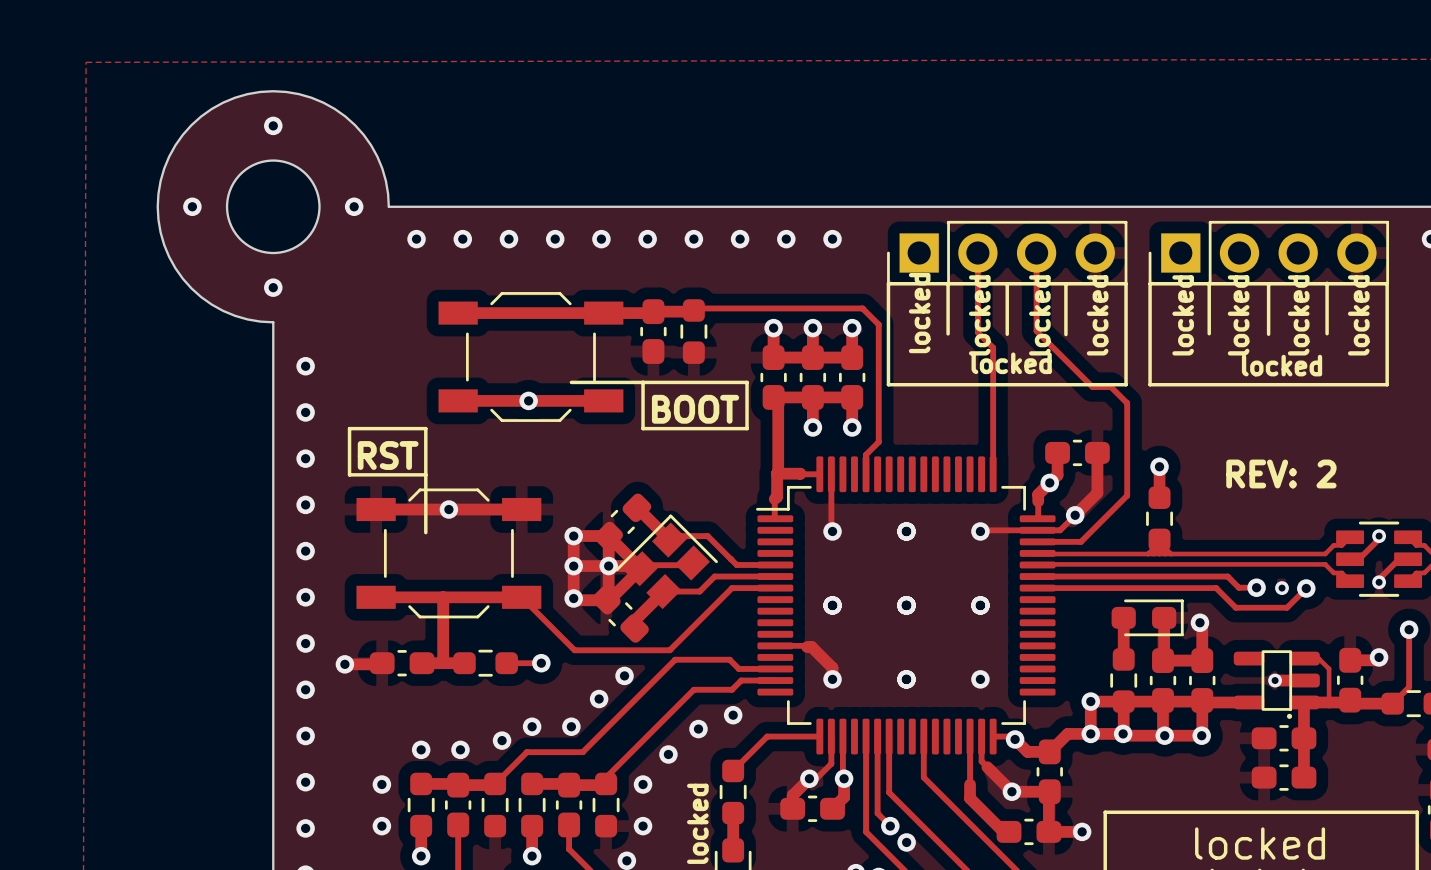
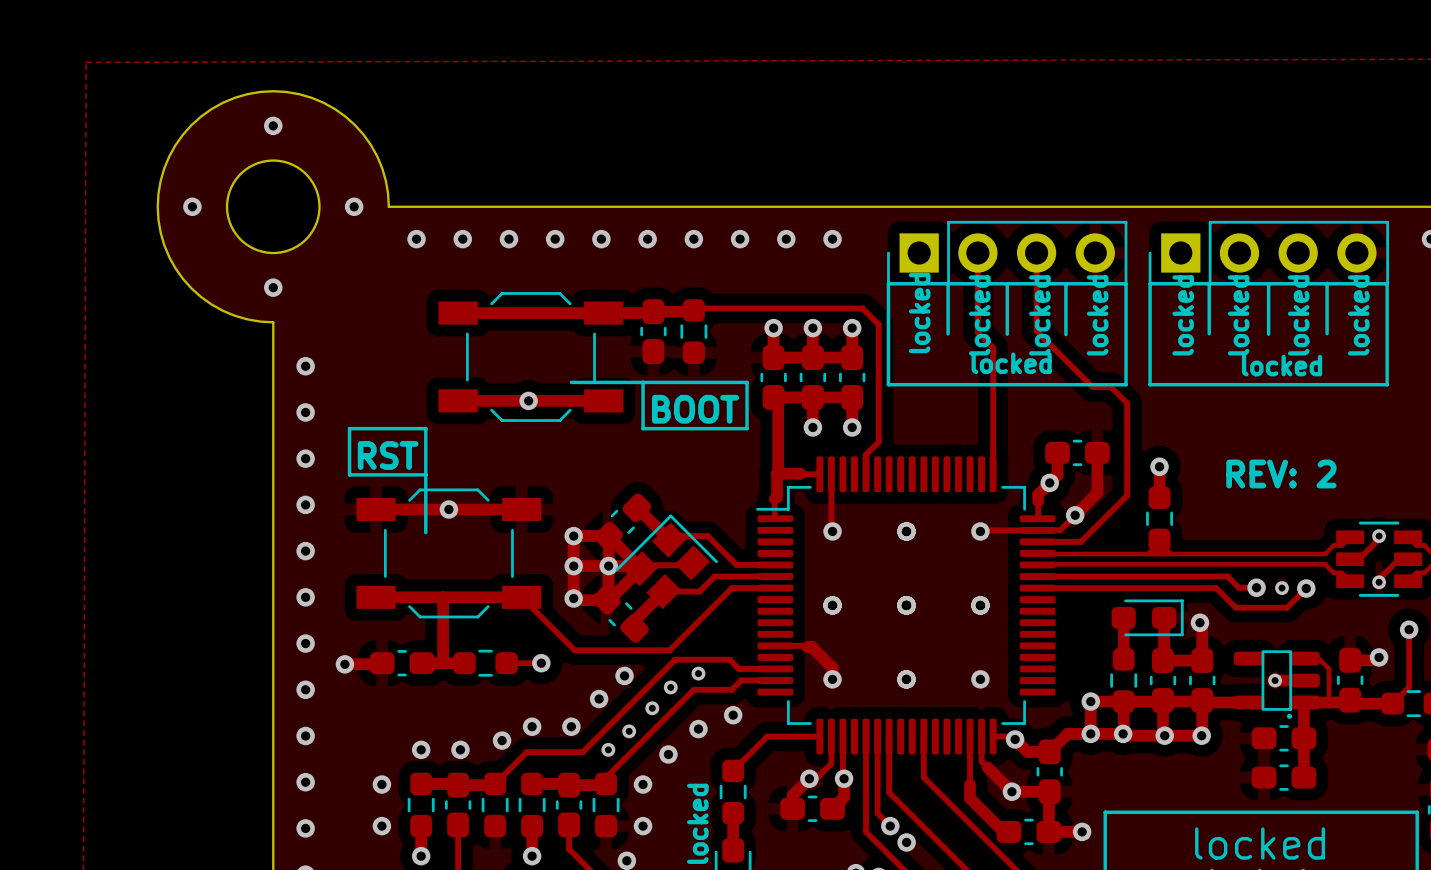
via: none -> (698, 673)
via: none -> (670, 687)
via: none -> (652, 708)
via: none -> (629, 731)
via: none -> (608, 749)

